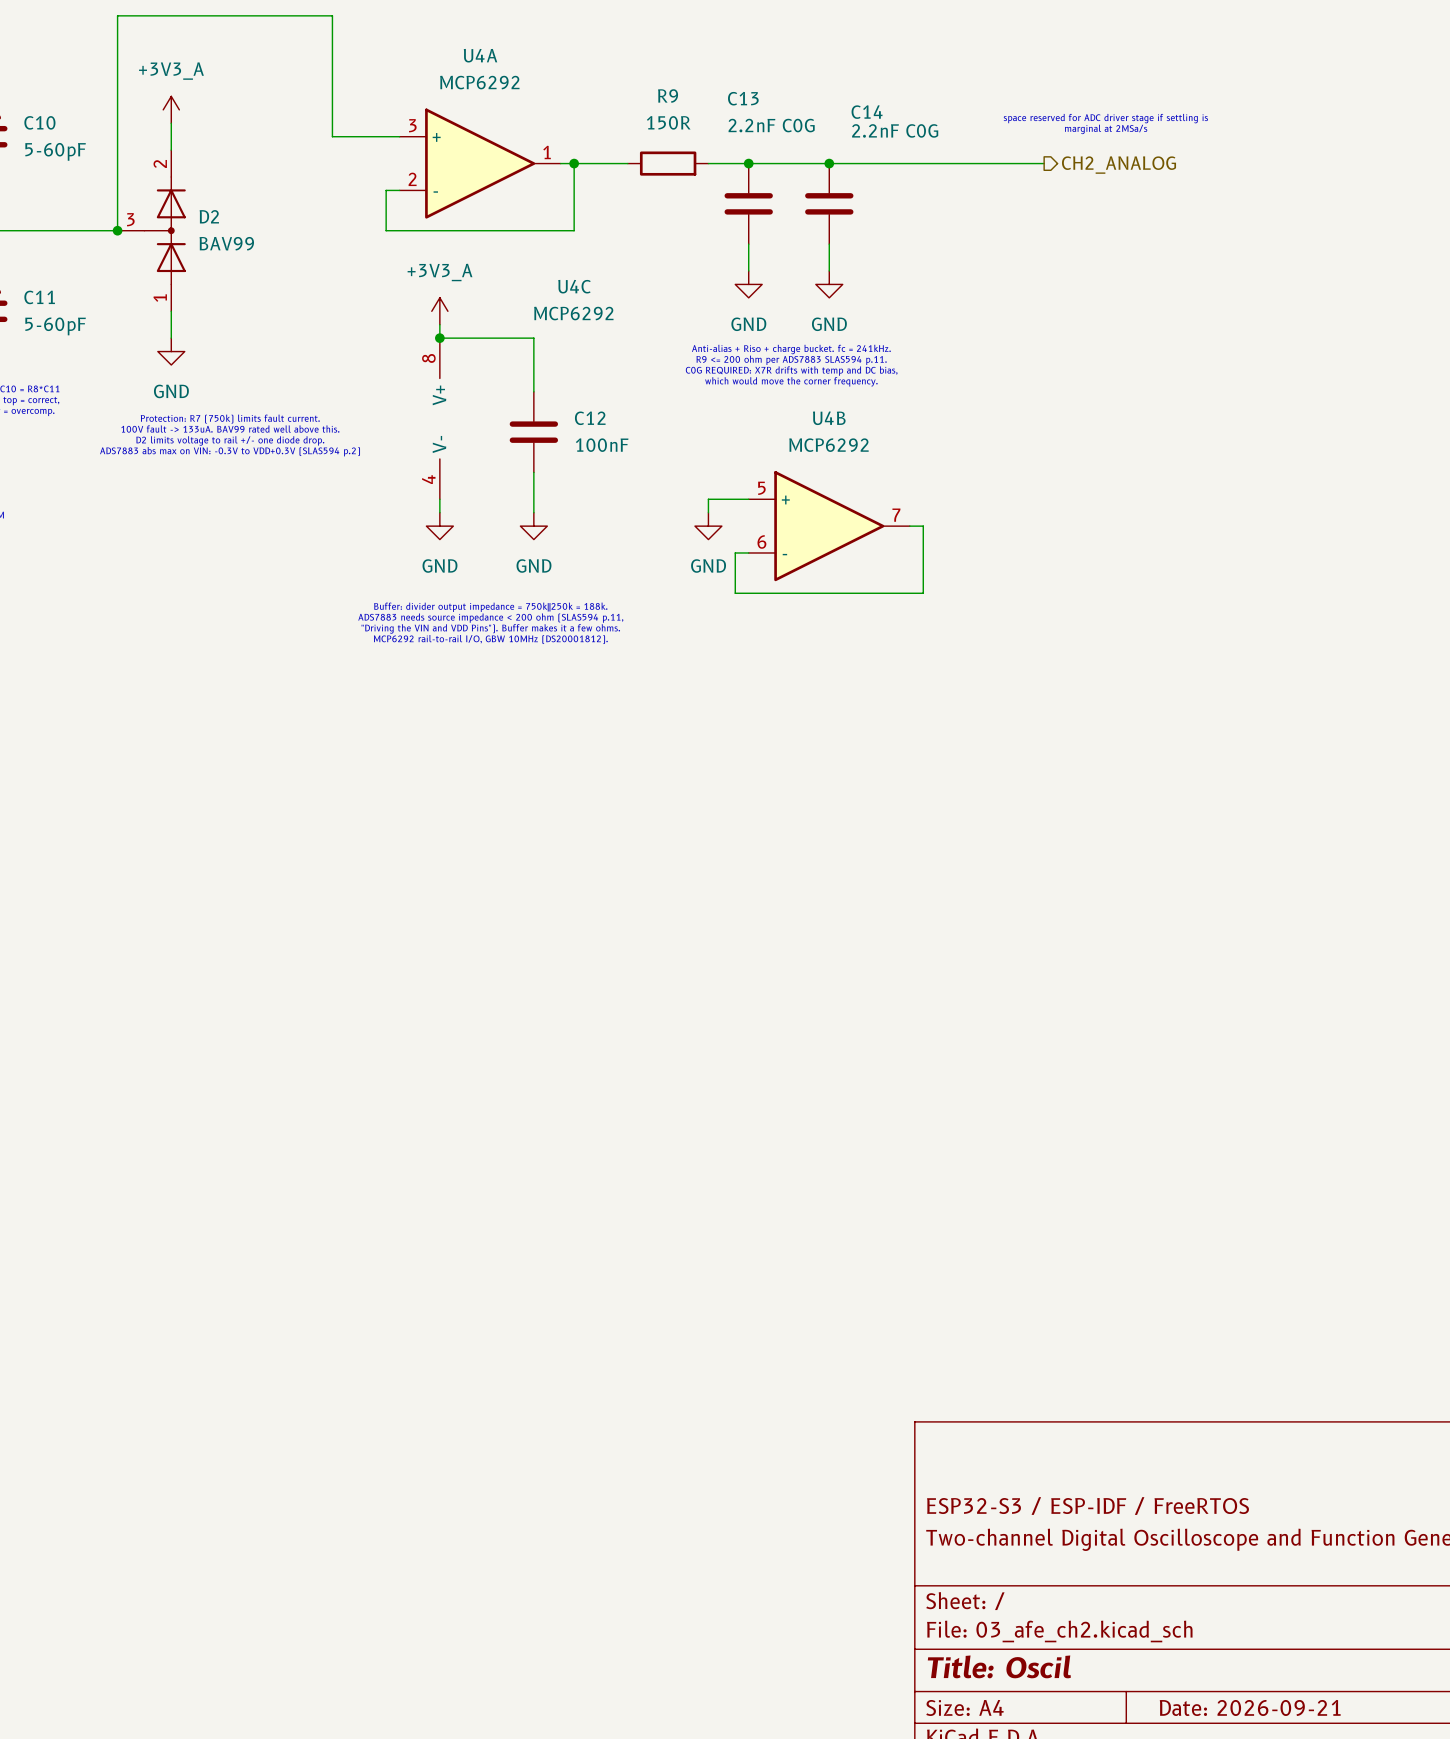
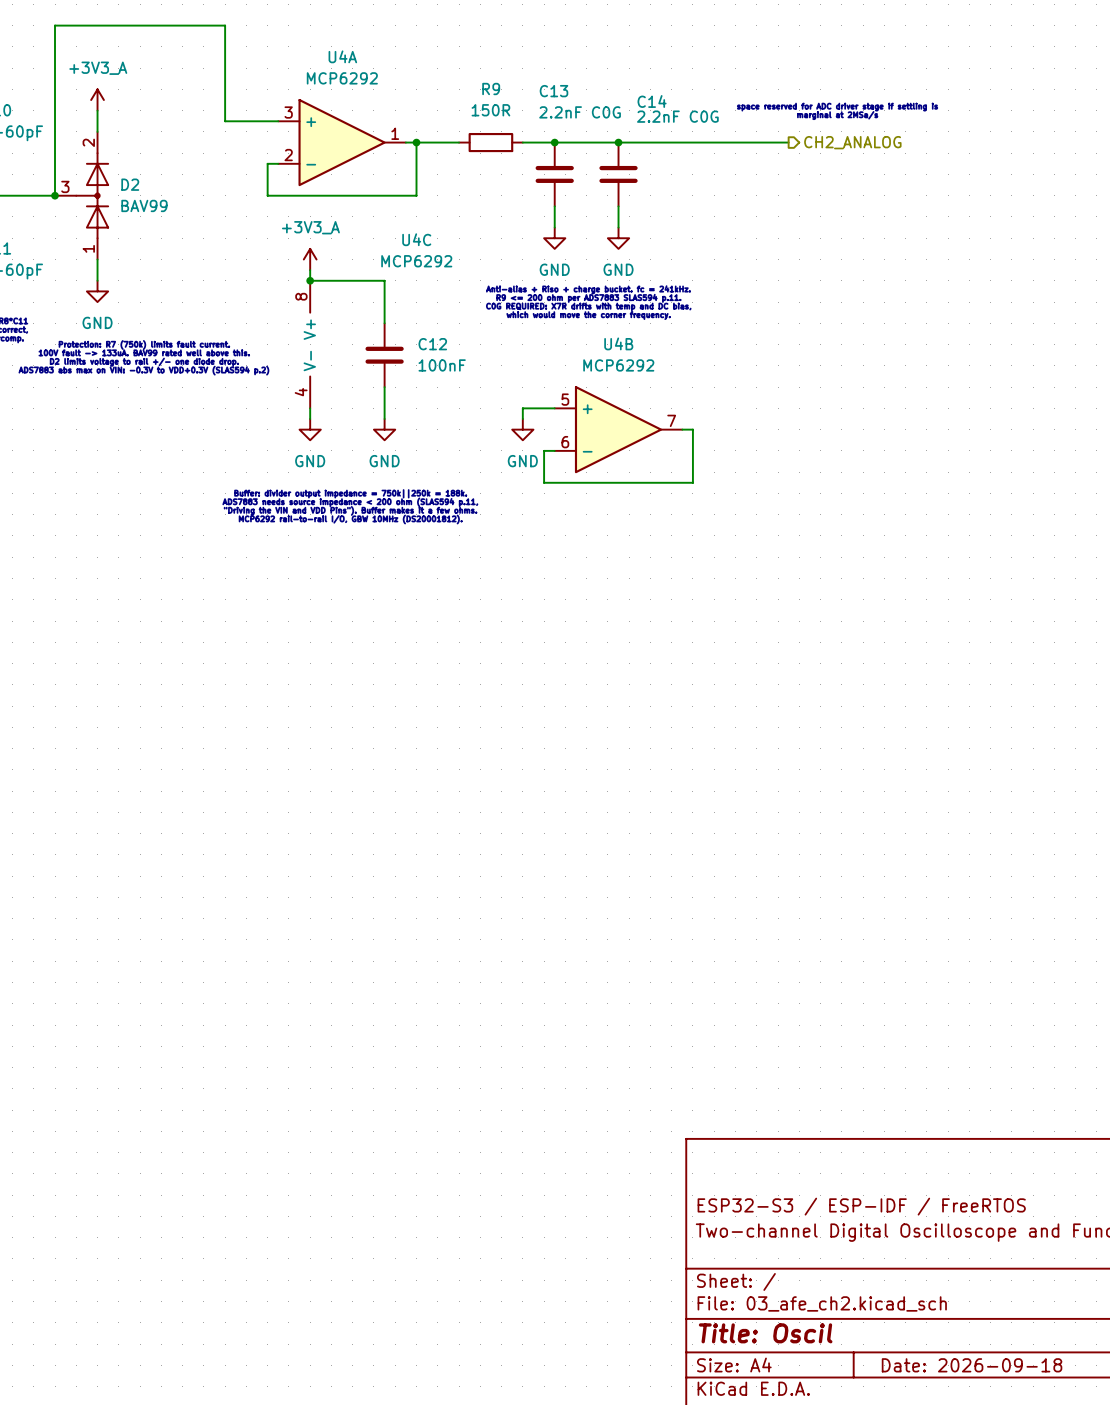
title block: Date: 2026-09-21 (1250, 1707) -> Date: 2026-09-18 (972, 1365)

